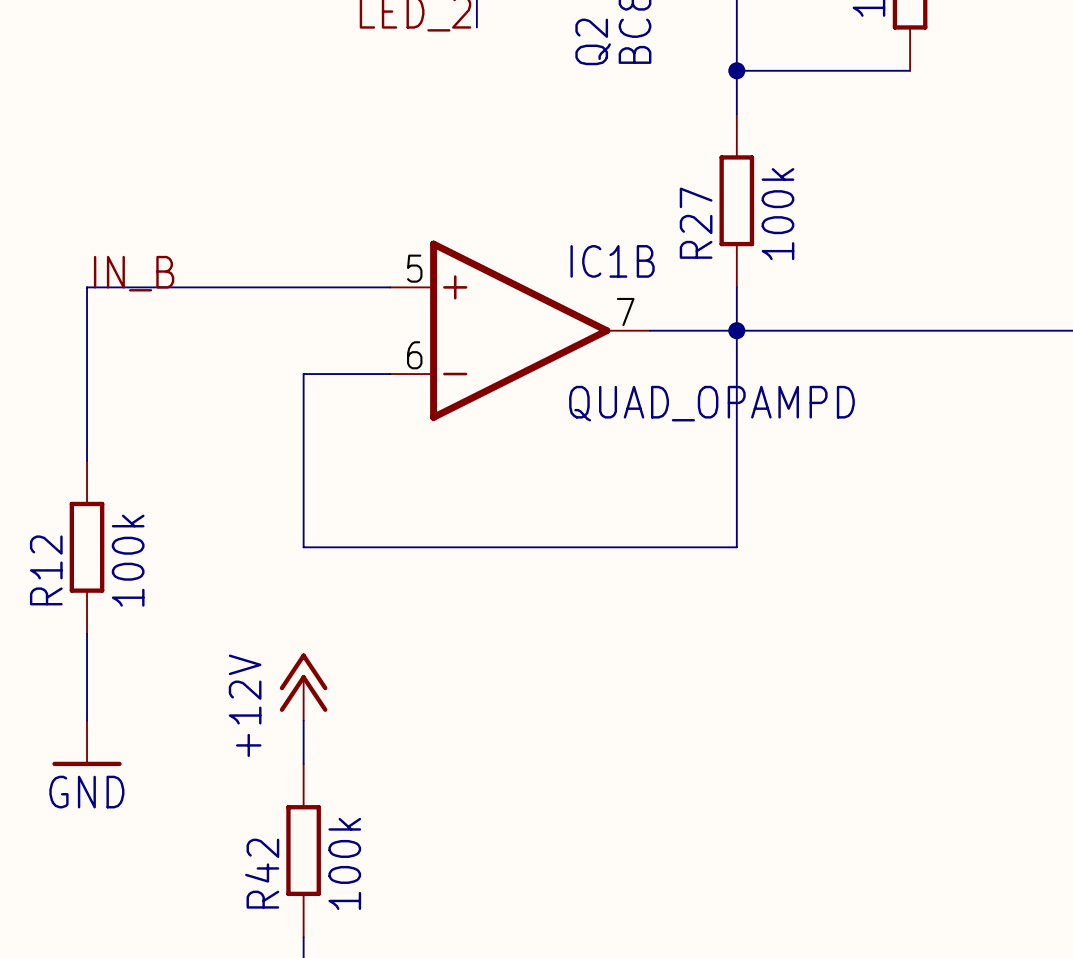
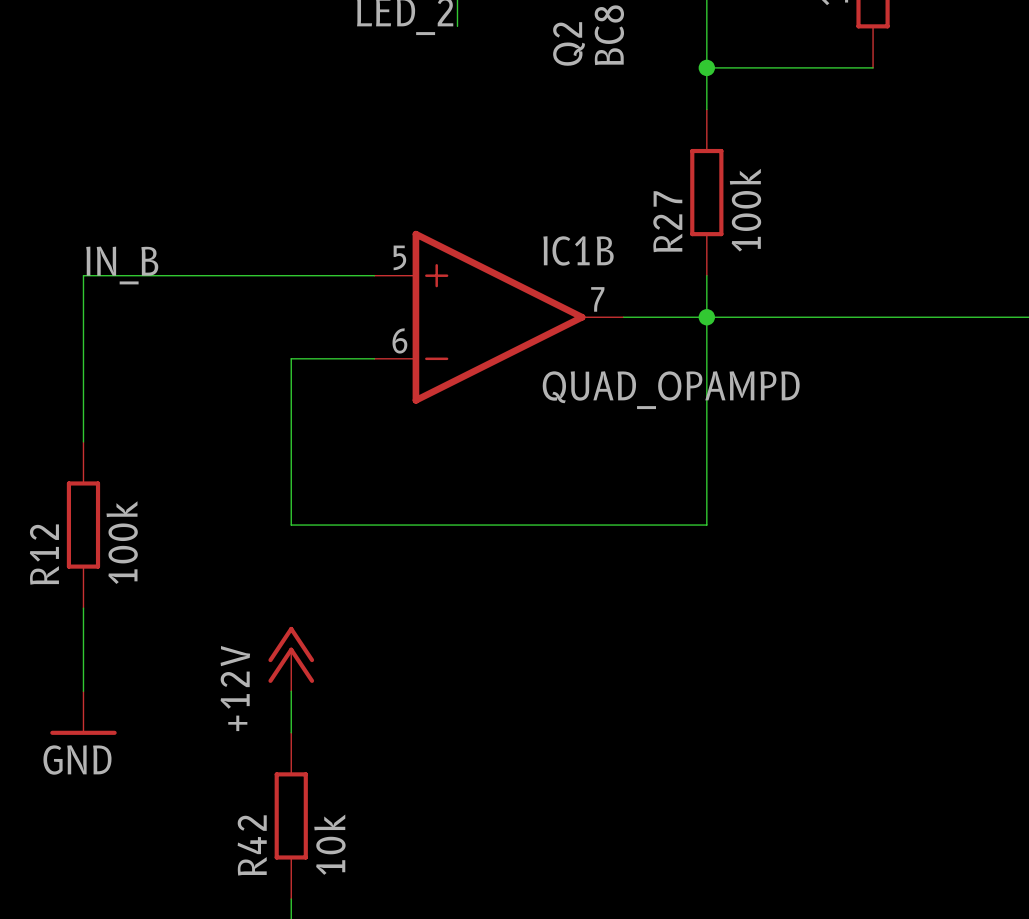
R42 value: 100k (344, 863) -> 10k (329, 844)

